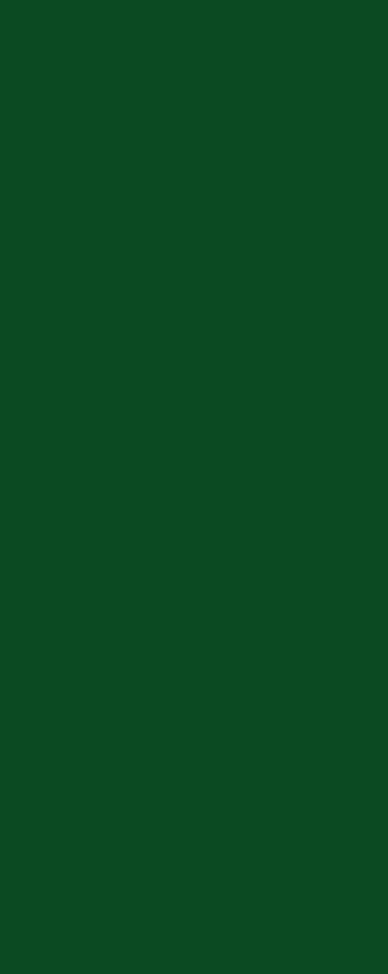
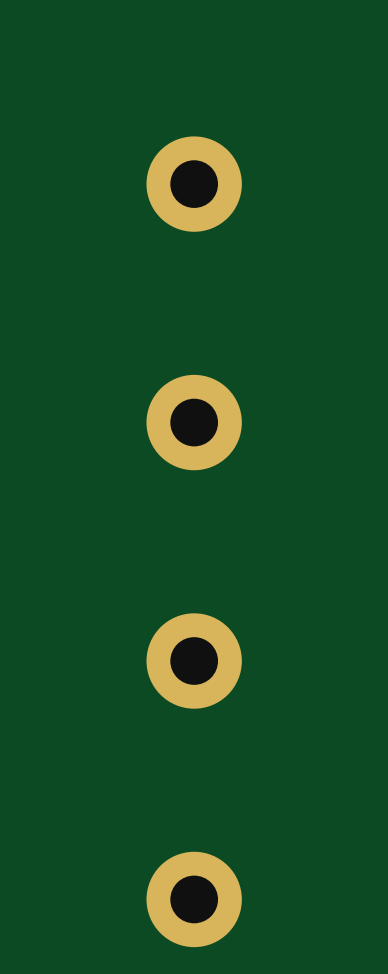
part: none -> (194, 184)
part: none -> (194, 422)
part: none -> (194, 661)
part: none -> (194, 899)

